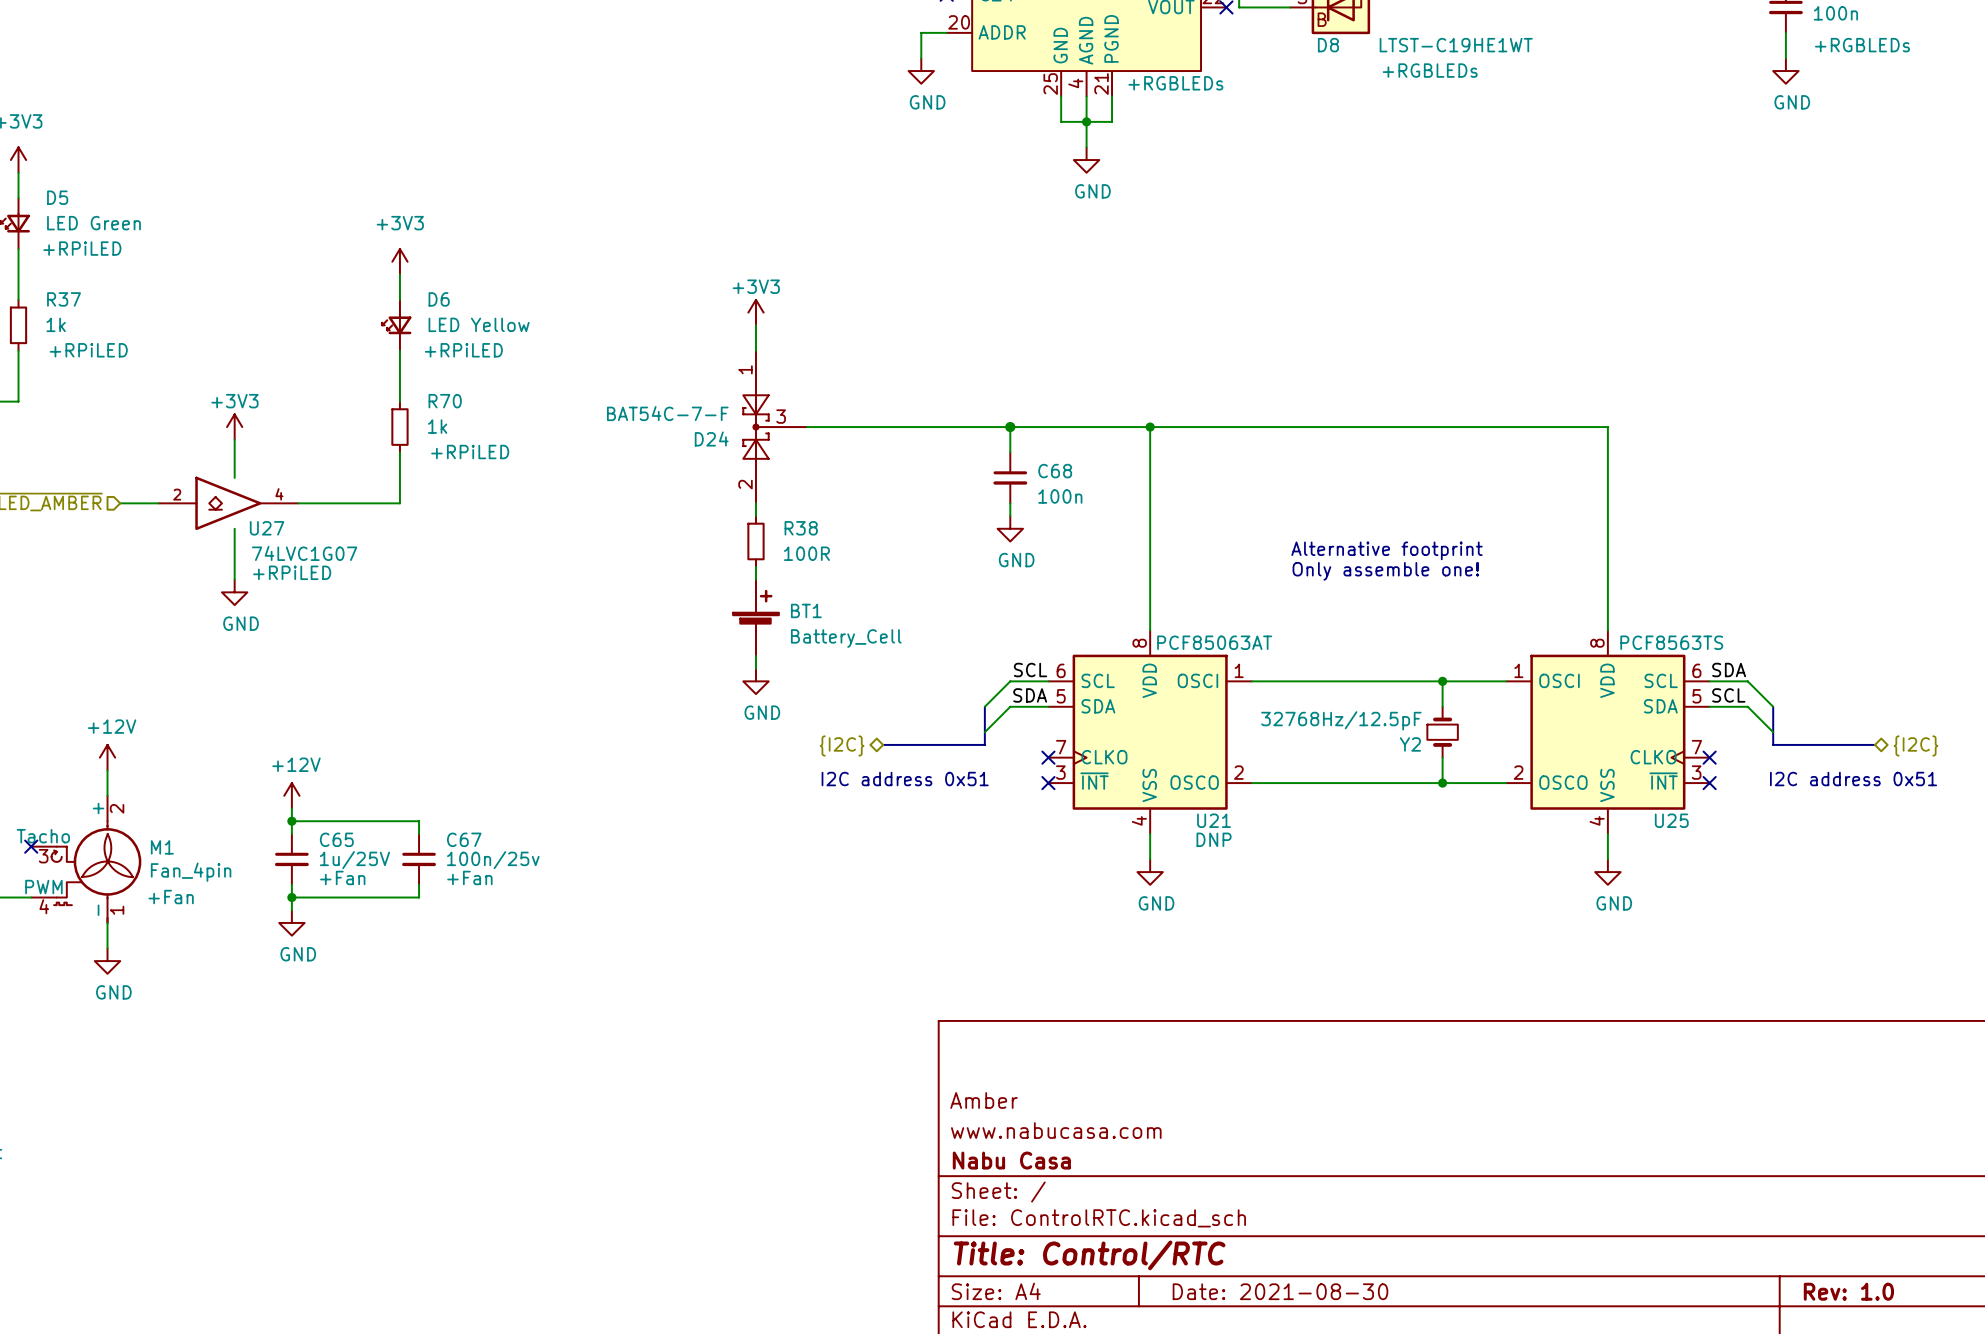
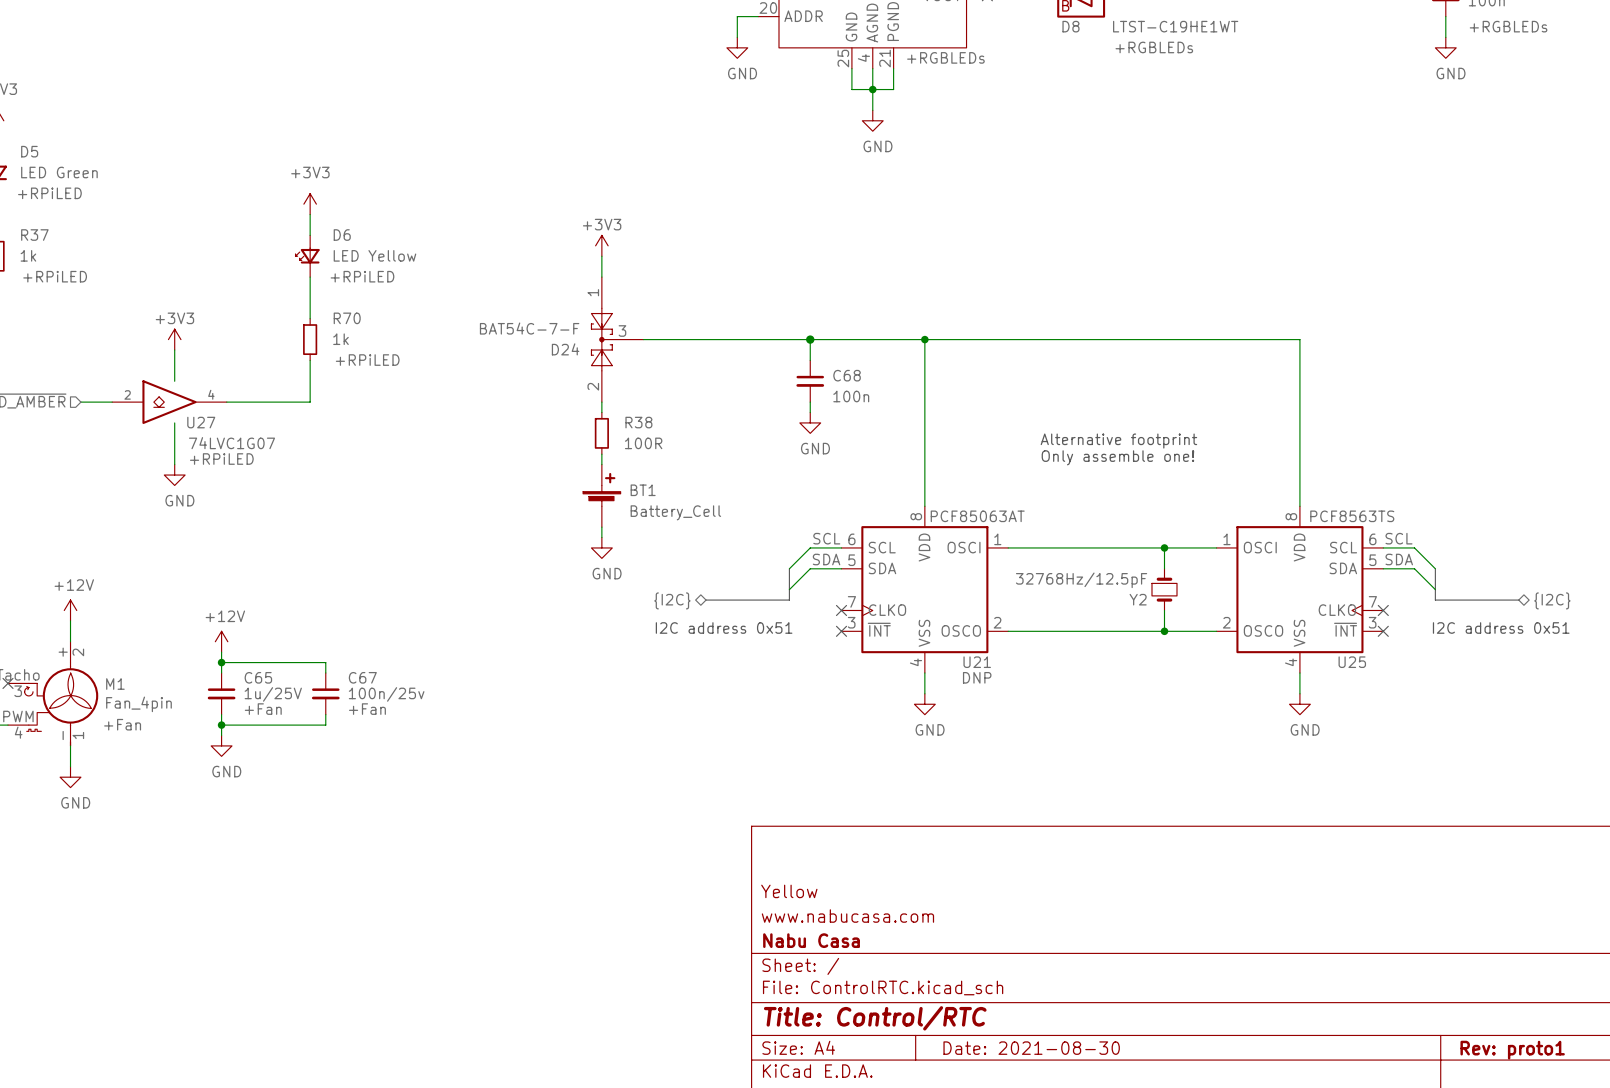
label: SDA (1729, 670) -> SCL (1398, 538)
label: SCL (1728, 695) -> SDA (1399, 559)
title block: Amber (984, 1100) -> Yellow (789, 891)
title block: Rev: 1.0 (1848, 1291) -> Rev: proto1 (1512, 1050)

